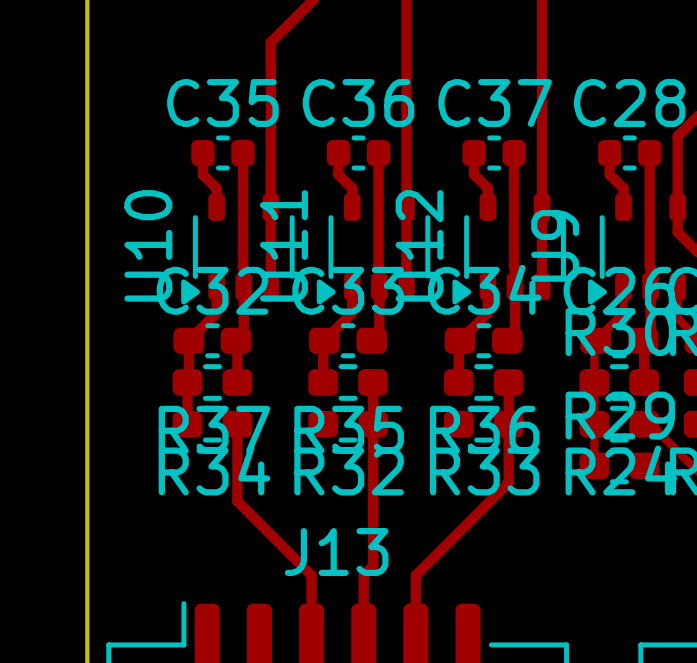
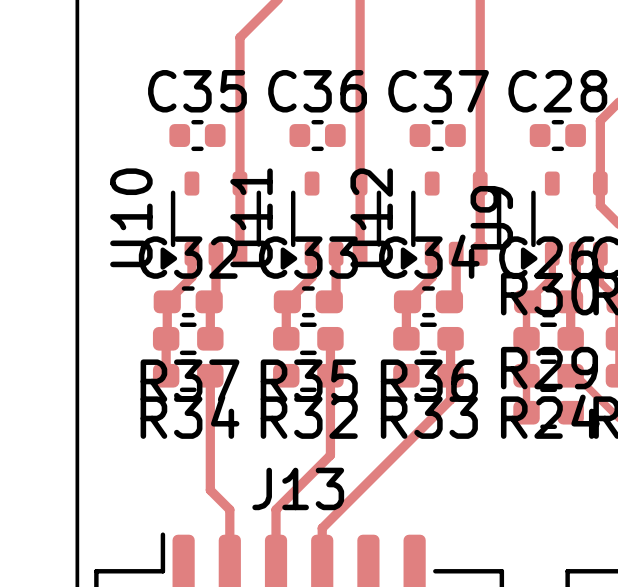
track: (202, 152) (202, 174) (216, 188) (216, 207) -> none
track: (242, 152) (243, 286) -> none
track: (338, 152) (338, 174) (352, 188) (352, 207) -> none
track: (378, 152) (379, 286) -> none
track: (474, 152) (474, 174) (487, 188) (487, 207) -> none
track: (514, 152) (515, 286) -> none
track: (609, 152) (609, 174) (623, 188) (623, 207) -> none
track: (649, 152) (650, 286) -> none
track: (508, 451) (508, 482) (415, 575) (415, 639) -> (450, 399) (322, 528)
track: (237, 501) (311, 575) -> (210, 444) (210, 490) (229, 509) (229, 566)
track: (373, 514) (373, 566) (363, 575) (363, 596) -> (330, 455) (276, 509)

